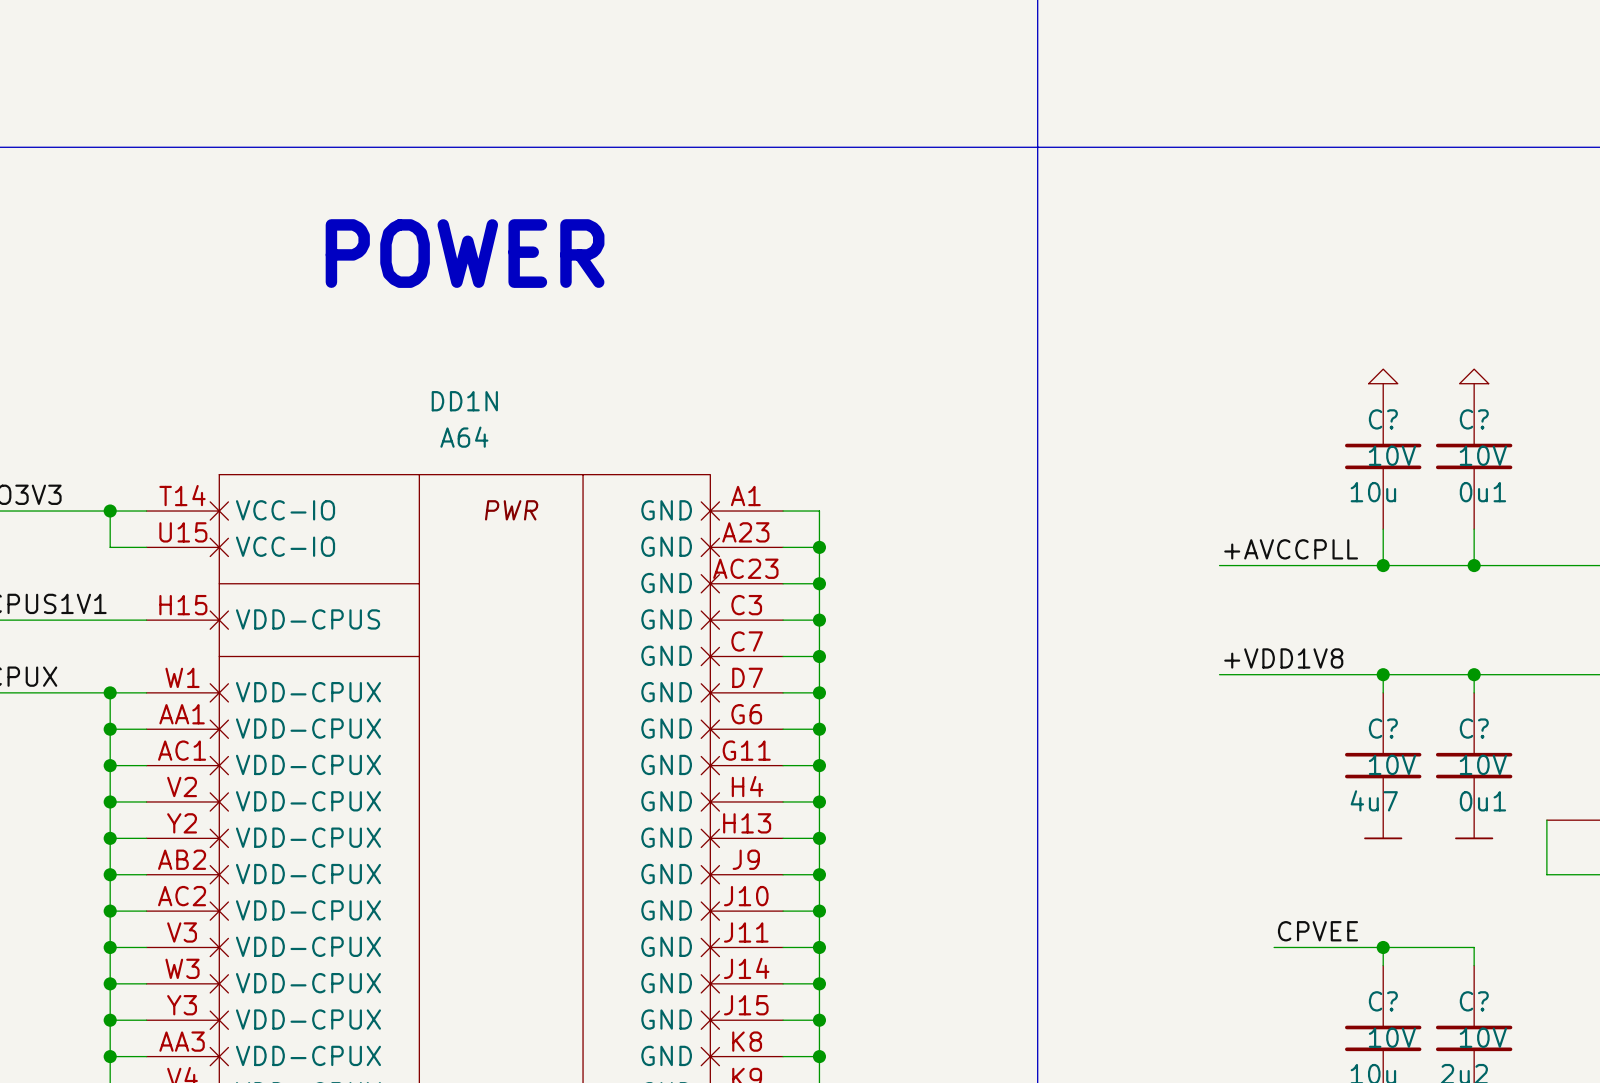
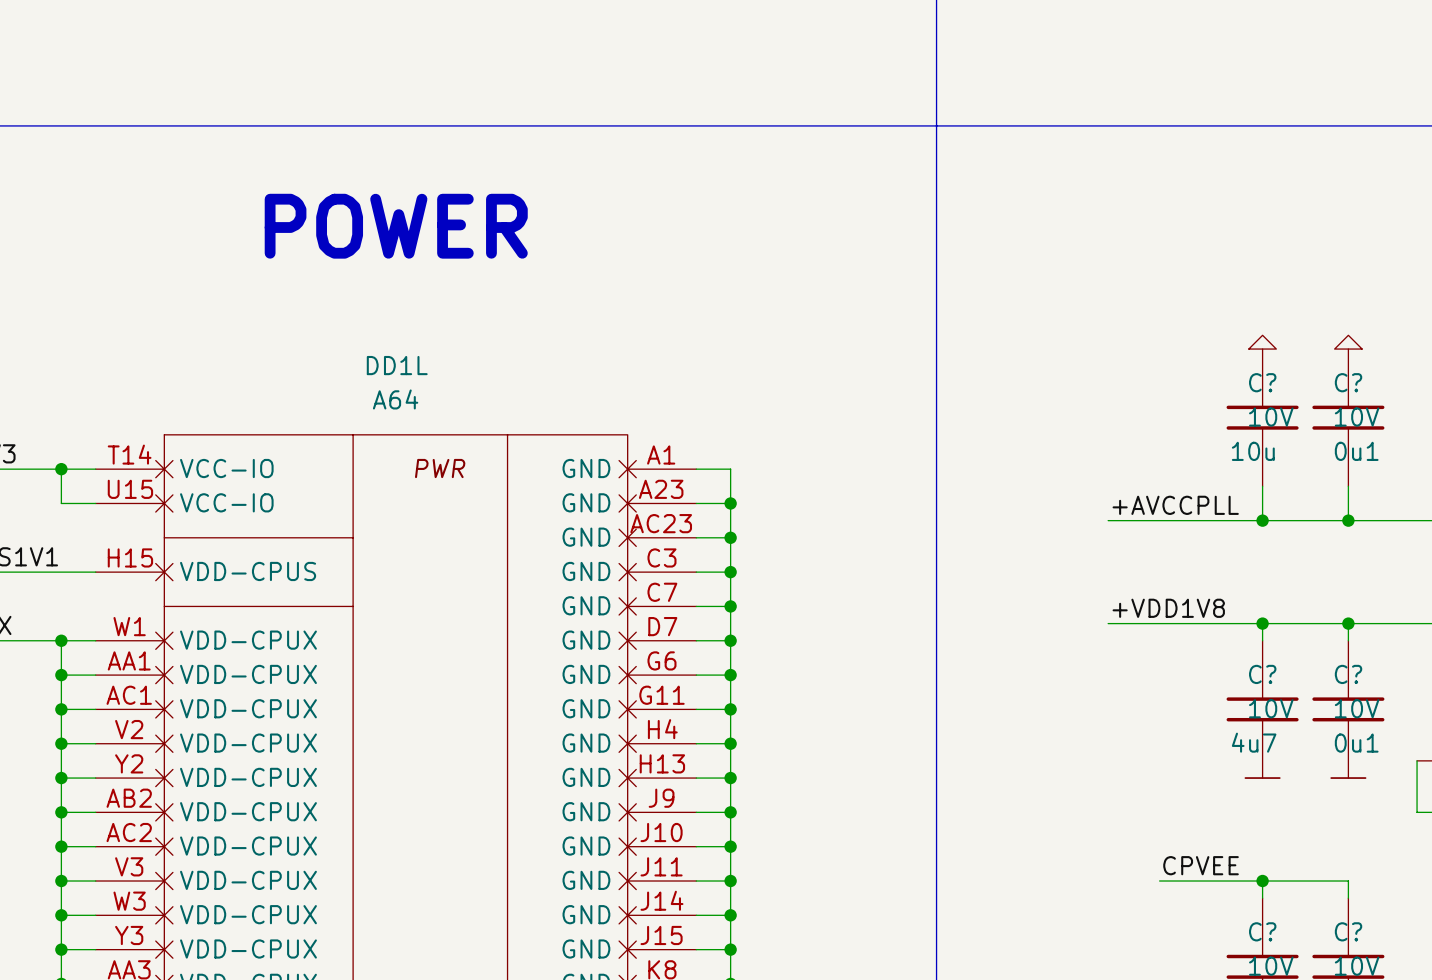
DD1N name: DD1N (464, 401) -> DD1L (397, 365)

